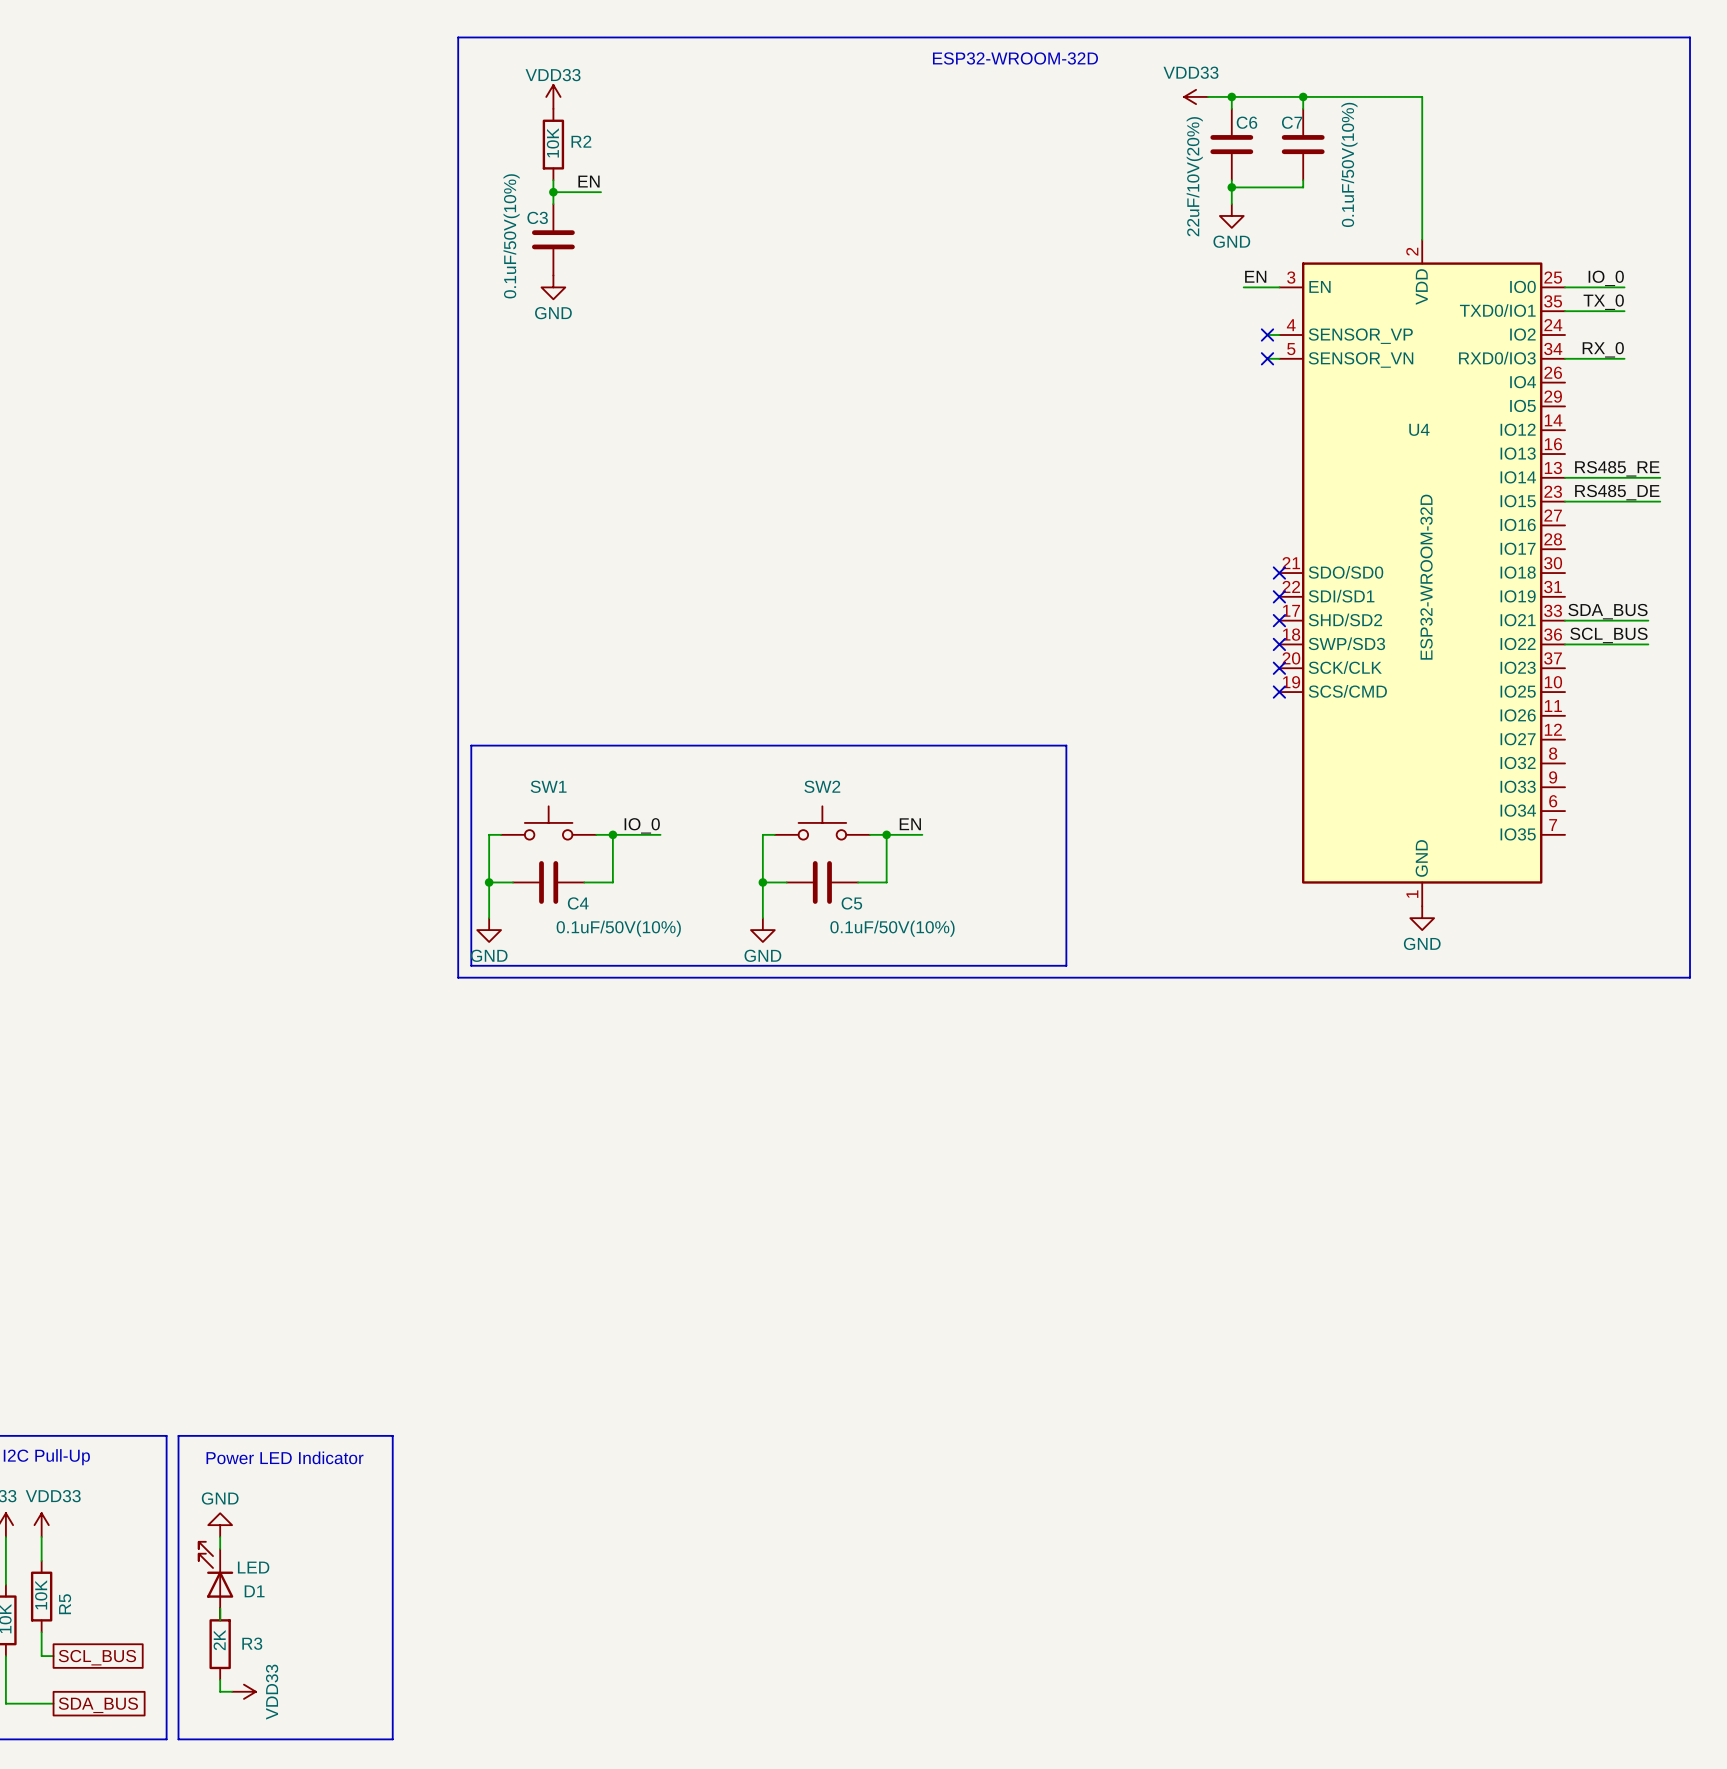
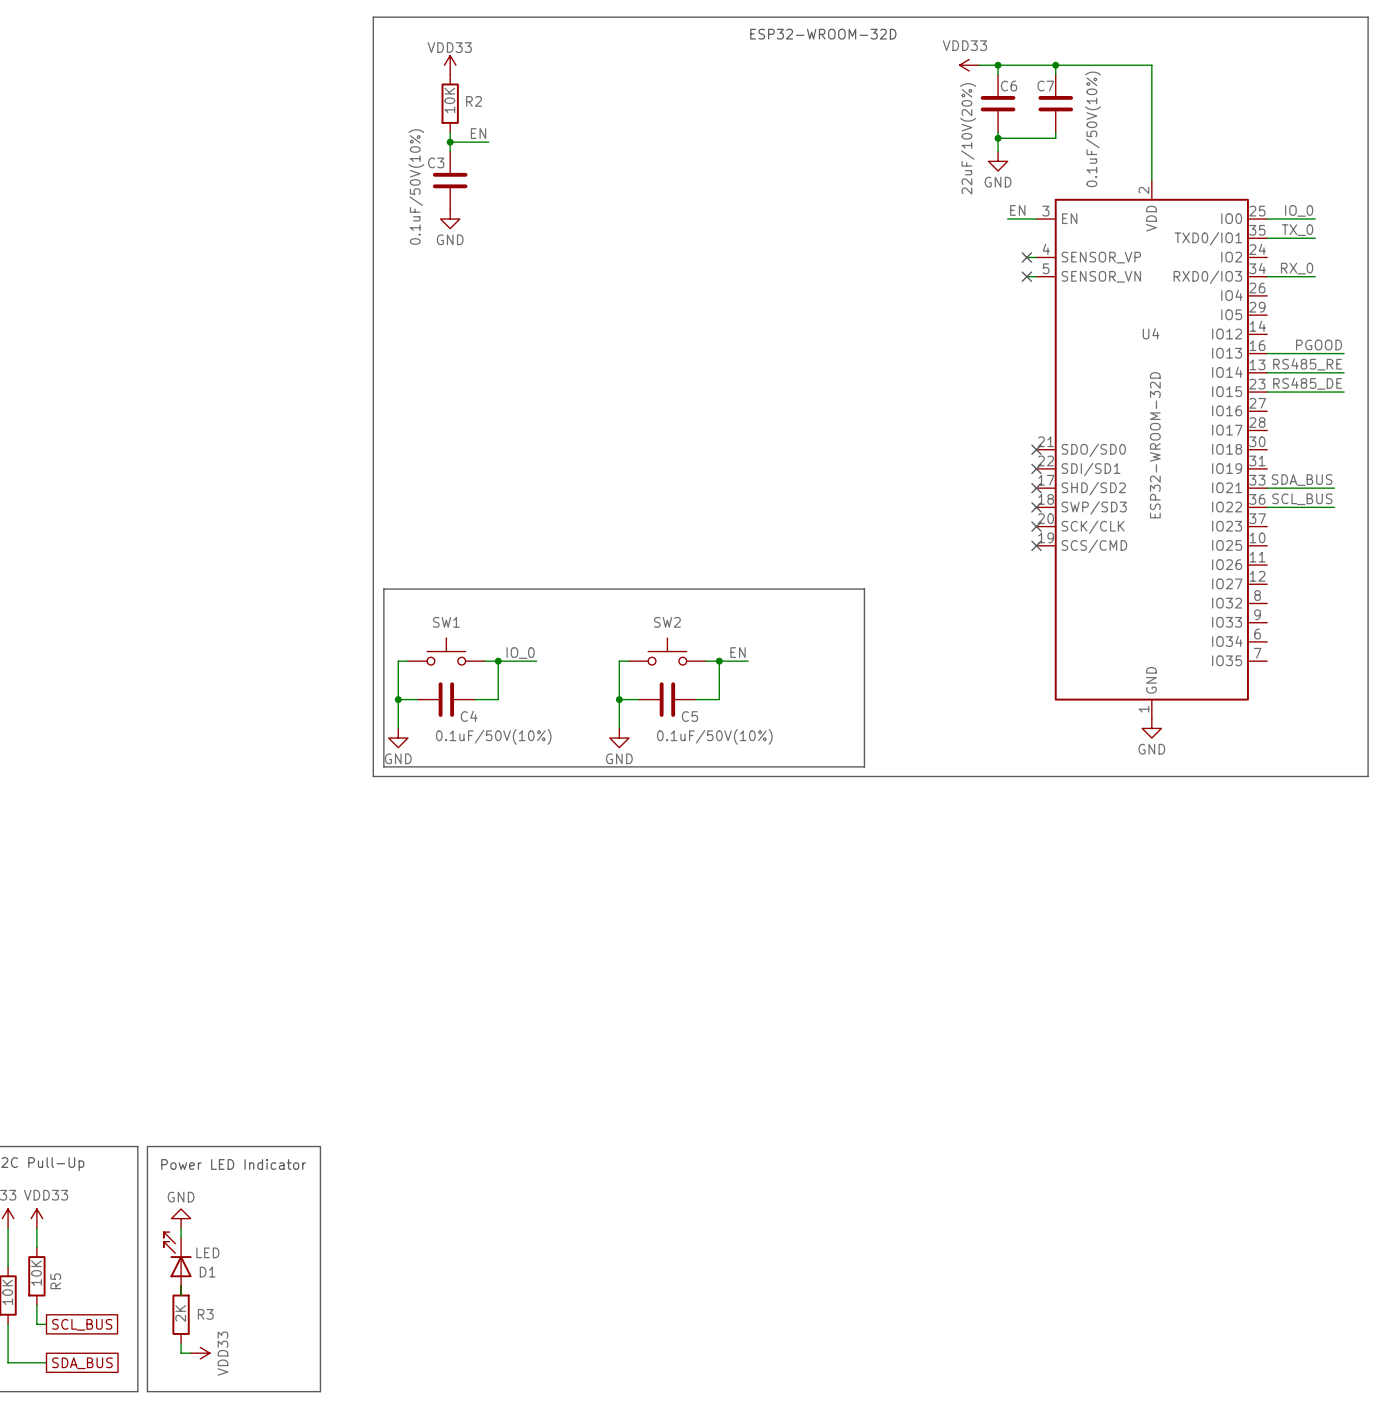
label: none -> PGOOD (1319, 345)
wire: none -> (1267, 353) (1344, 353)

